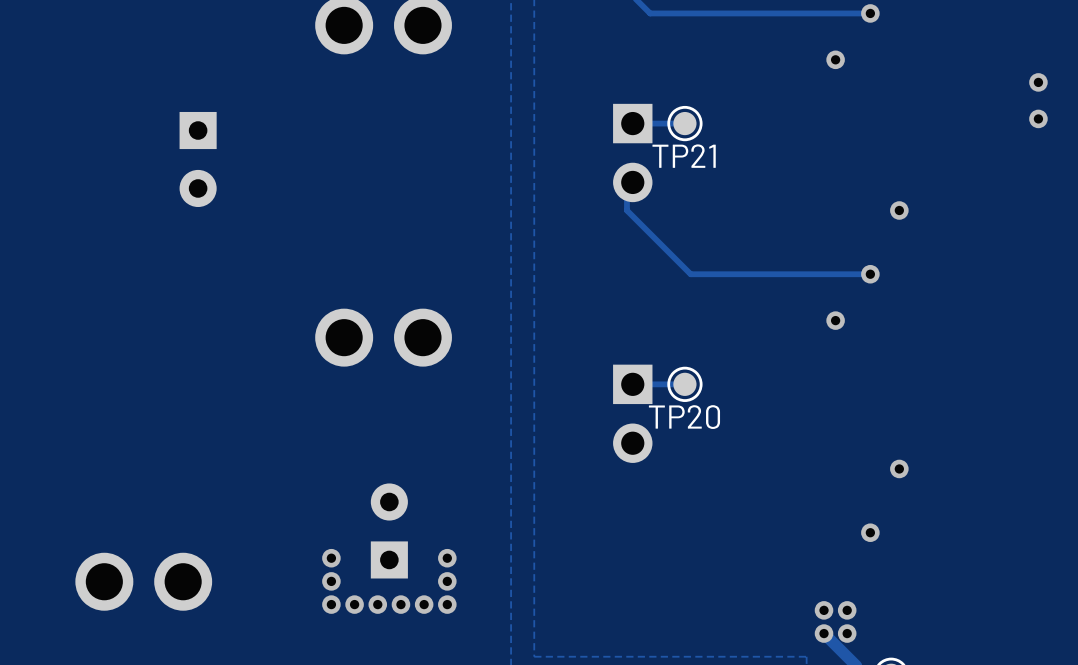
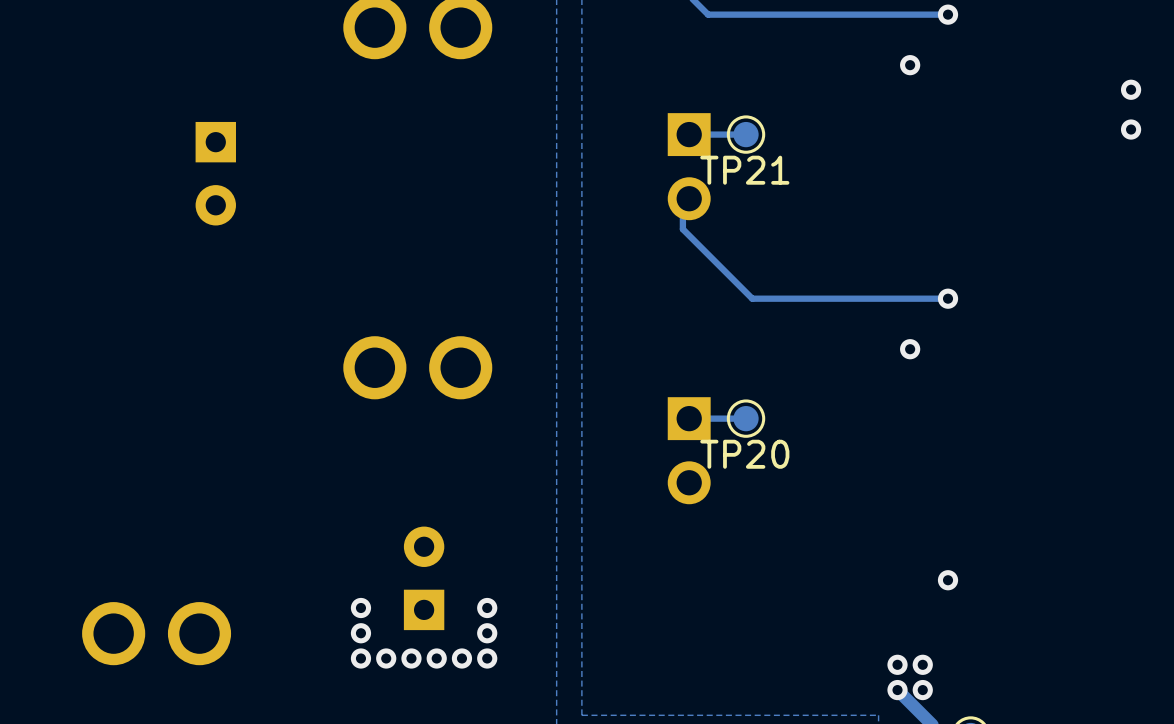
via: (899, 210) -> none
via: (899, 468) -> none

